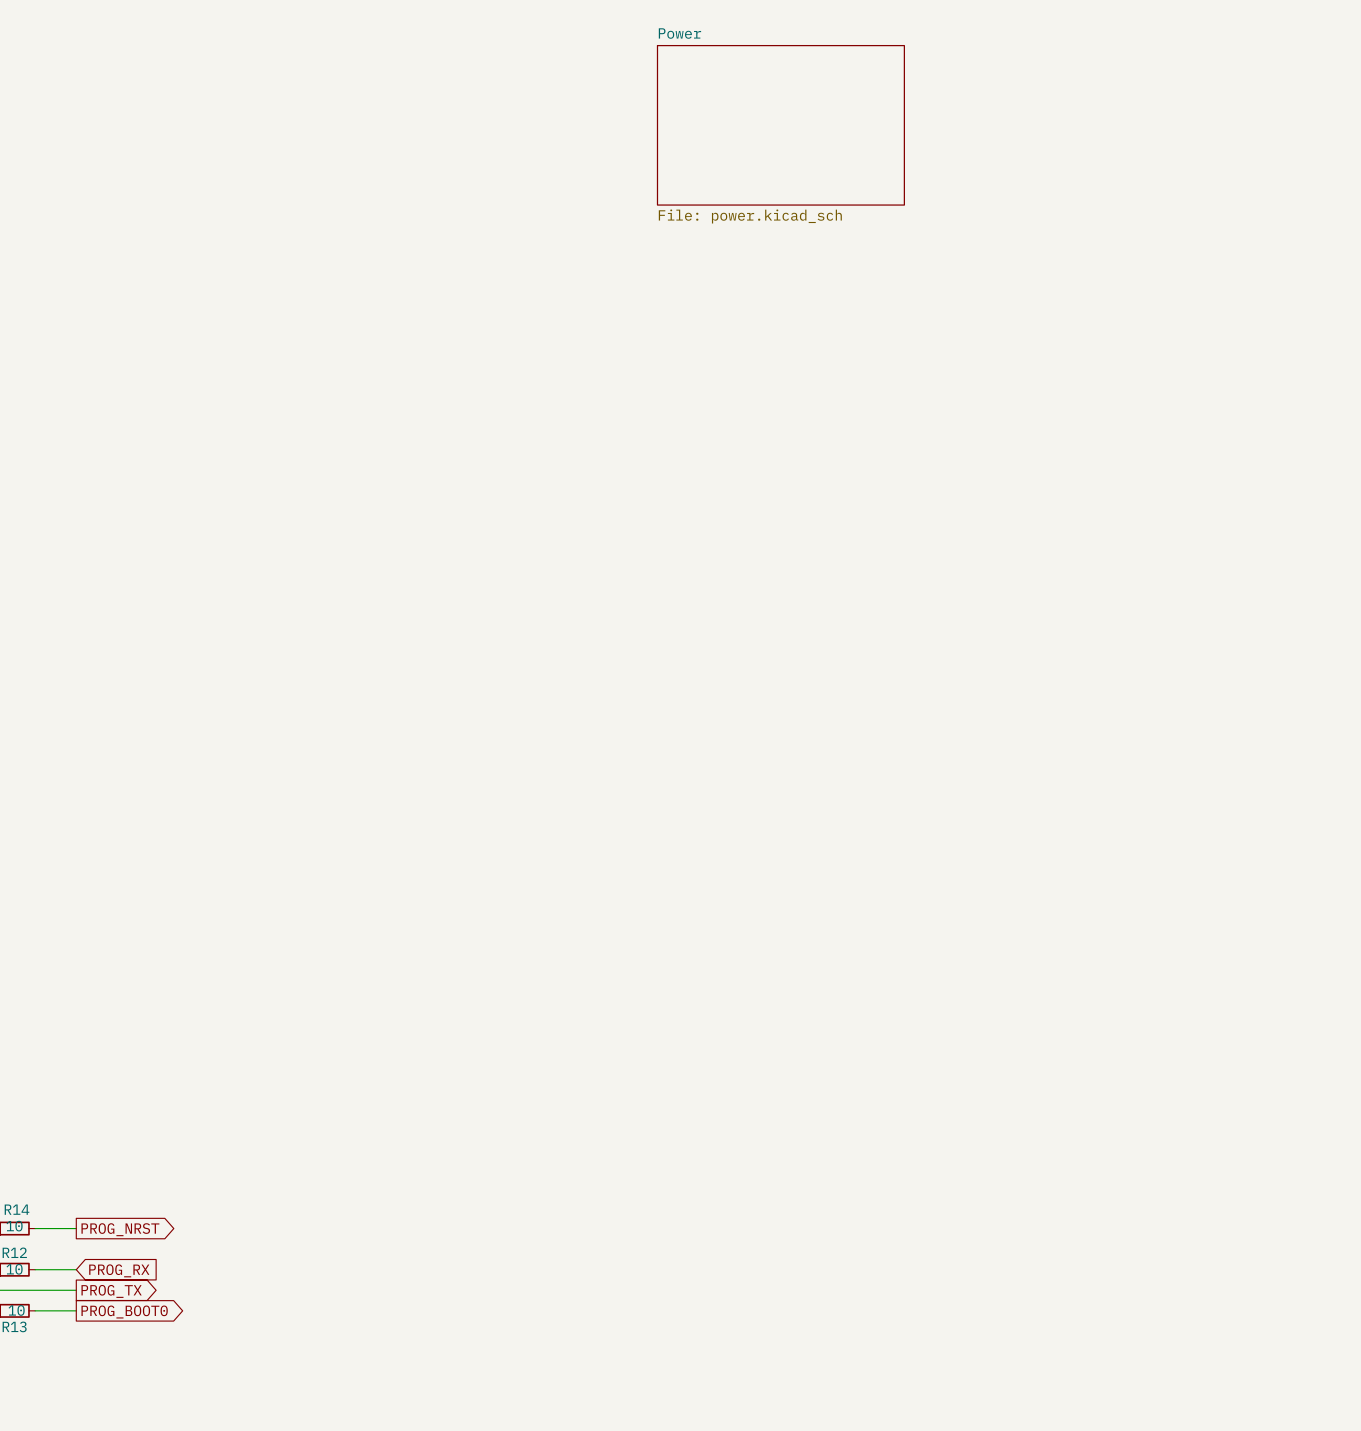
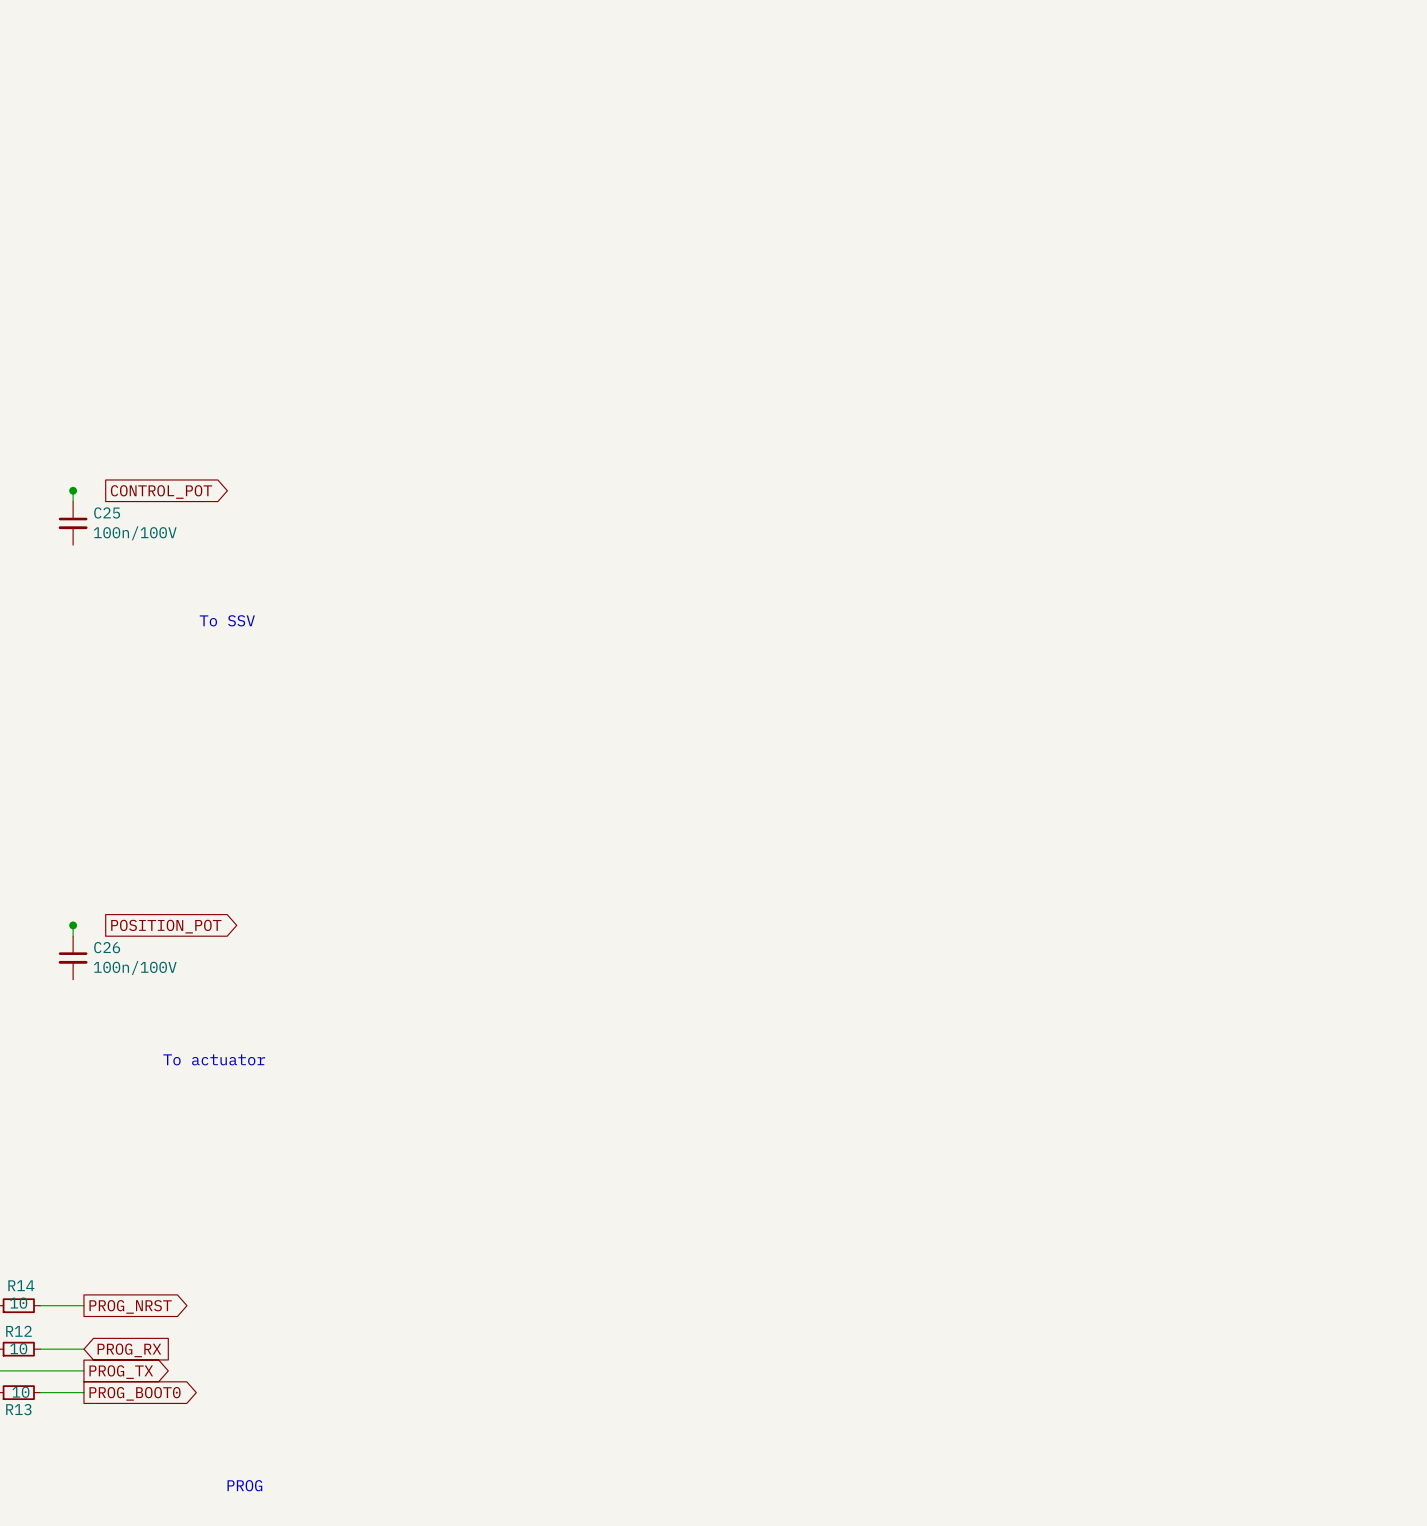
sheet Power: File: power.kicad_sch (780, 125) -> none
wire: none -> (73, 490) (73, 501)
junction: none -> (73, 490)
global label: none -> CONTROL_POT (161, 492)
C25: none -> 100n/100V (73, 523)
text: none -> To SSV (227, 620)
wire: none -> (73, 925) (73, 936)
junction: none -> (73, 925)
global label: none -> POSITION_POT (166, 926)
C26: none -> 100n/100V (73, 958)
text: none -> To actuator (214, 1059)
text: none -> PROG (244, 1485)

